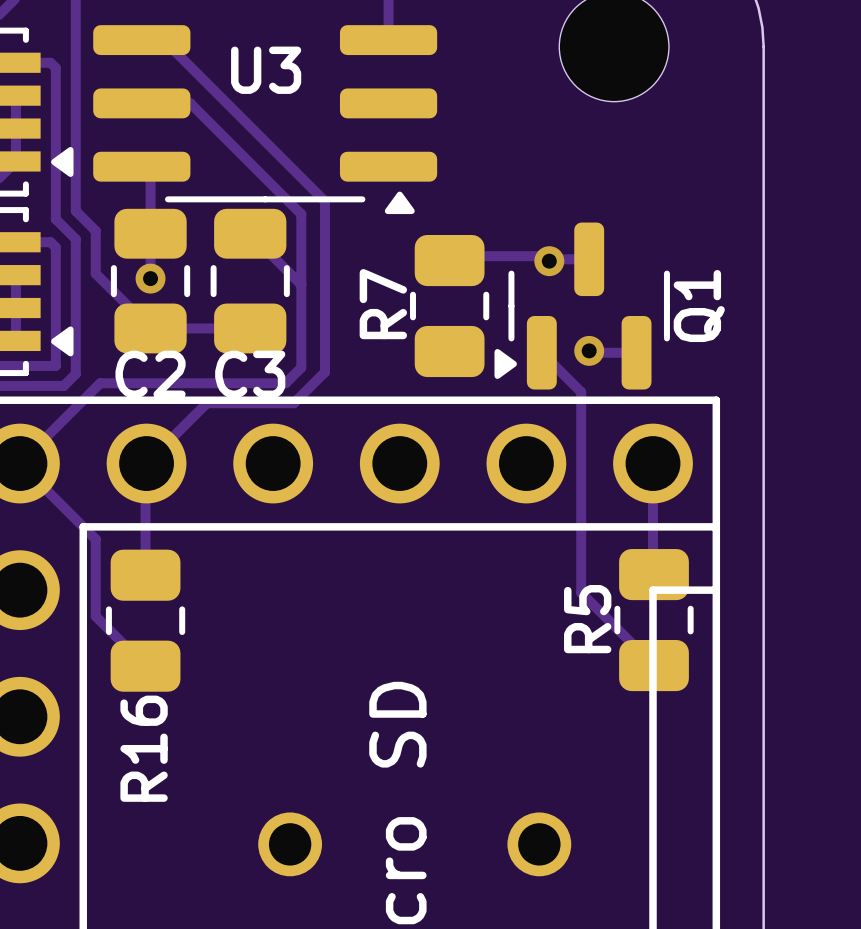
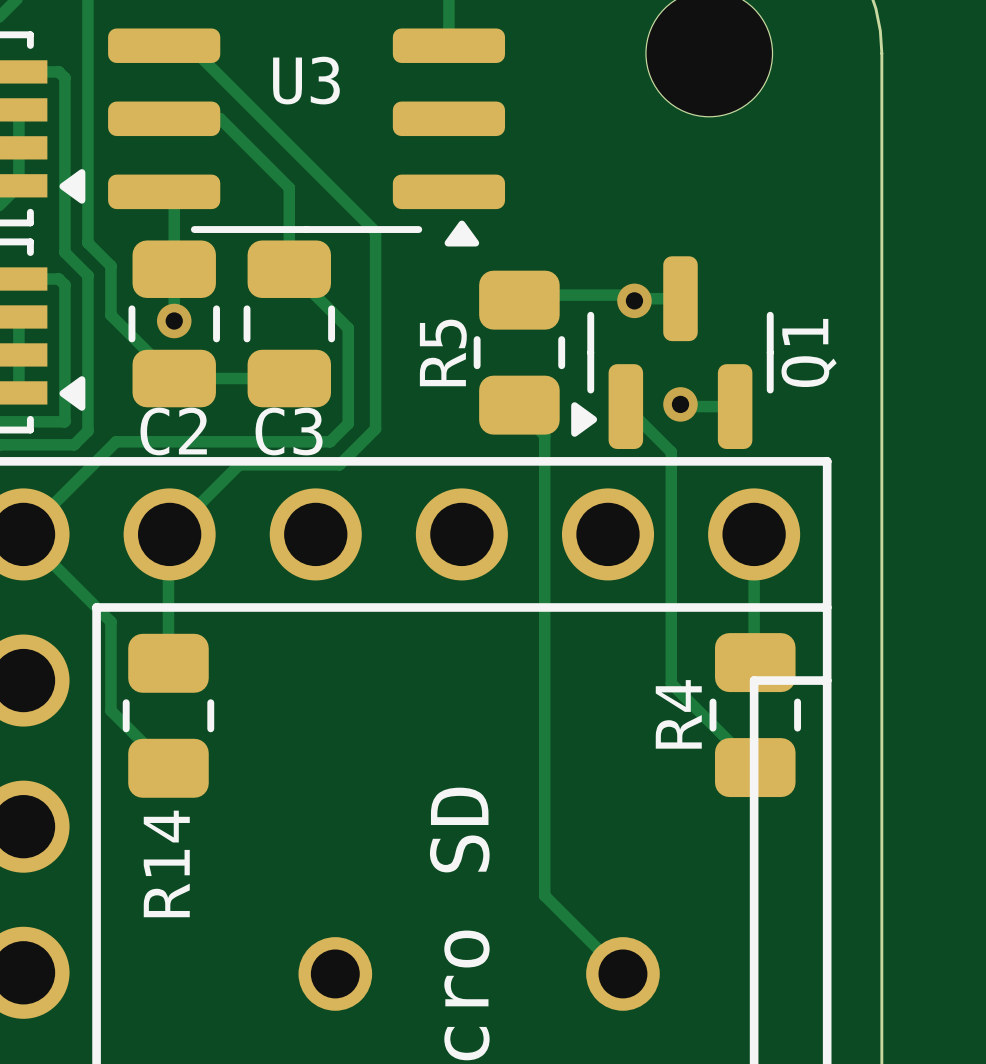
track: (250, 163) (301, 214) (301, 284) -> (289, 187) (289, 269)
R7 name: R7 (383, 304) -> R5 (443, 352)
track: none -> (519, 410) (544, 435) (544, 895) (622, 973)
R5 name: R5 (587, 619) -> R4 (678, 714)
R16 name: R16 (144, 748) -> R14 (166, 863)

